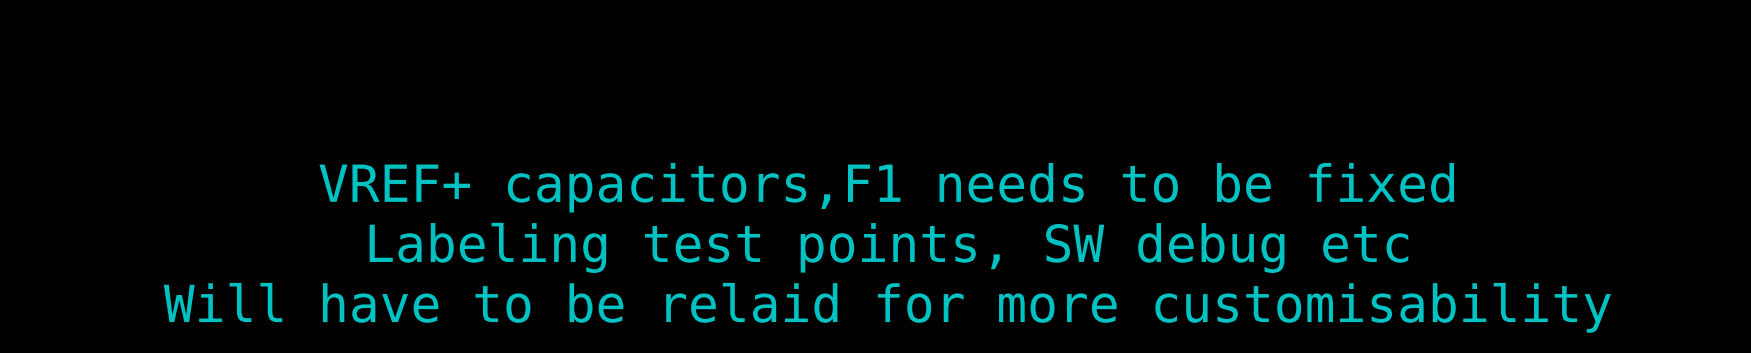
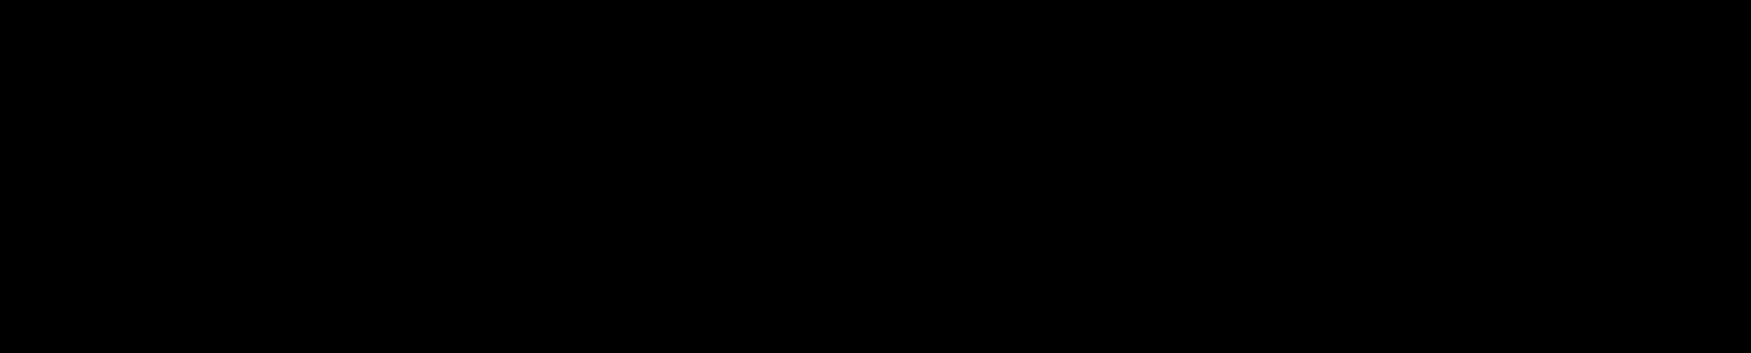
text: VREF+ capacitors,F1 needs to be fixed (886, 187) -> none
text: Labeling test points, SW debug etc (888, 247) -> none
text: Will have to be relaid for more customisability (887, 307) -> none

